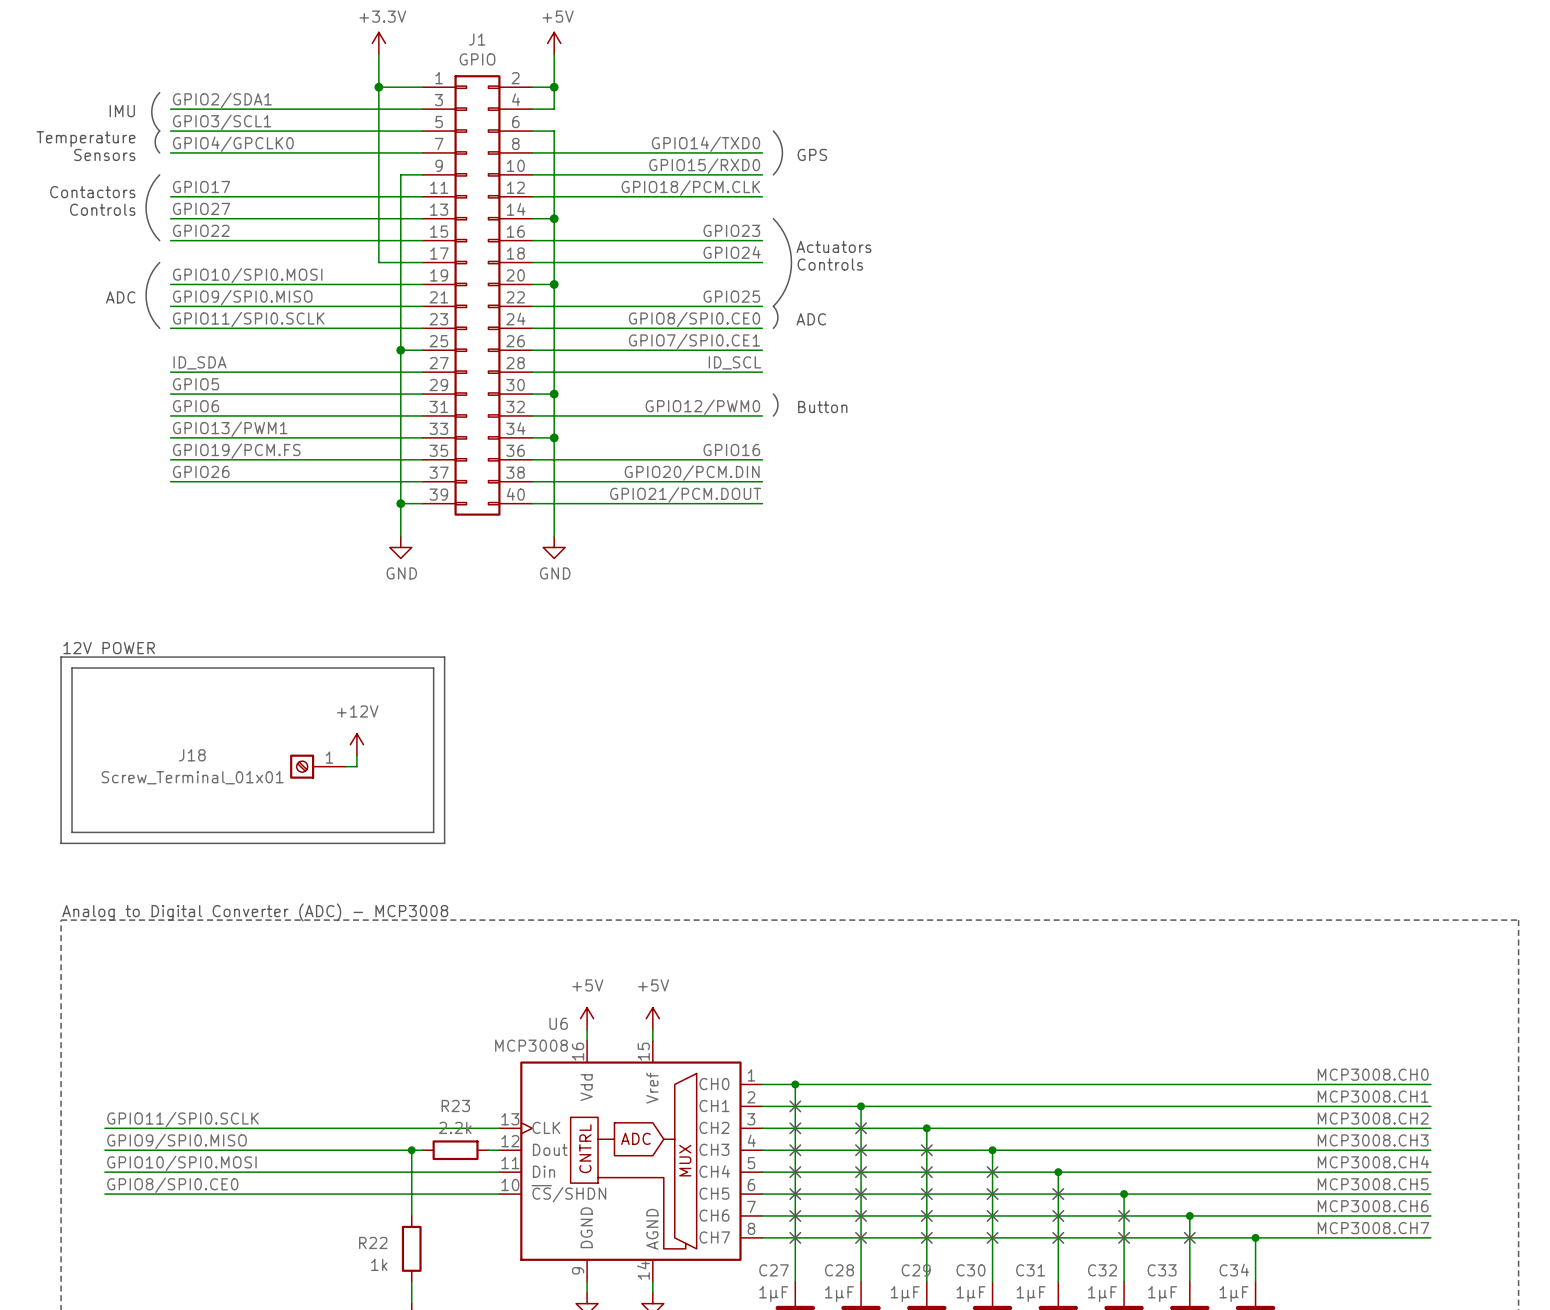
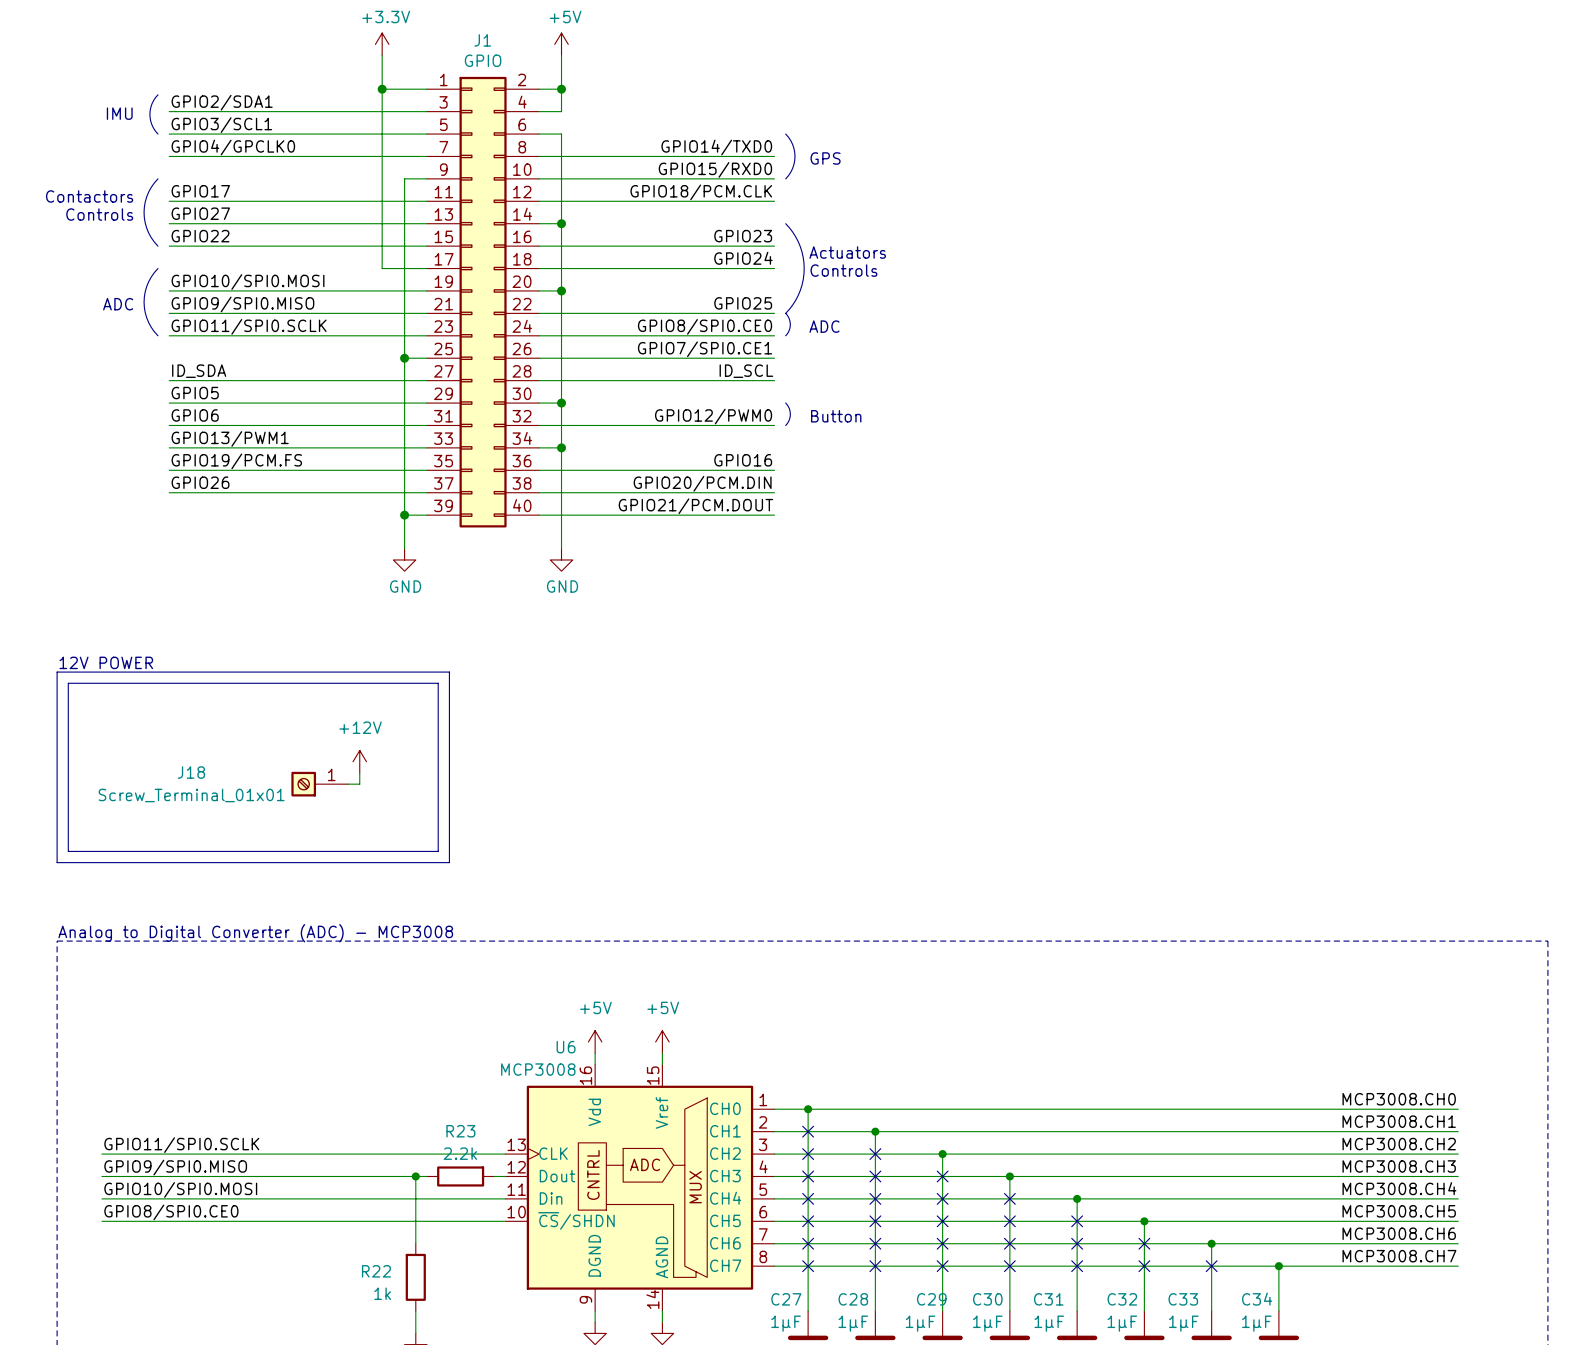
line: (159, 131) (155, 142) (159, 152) -> none
text: Temperature (86, 139) -> none
text: Sensors (104, 154) -> none

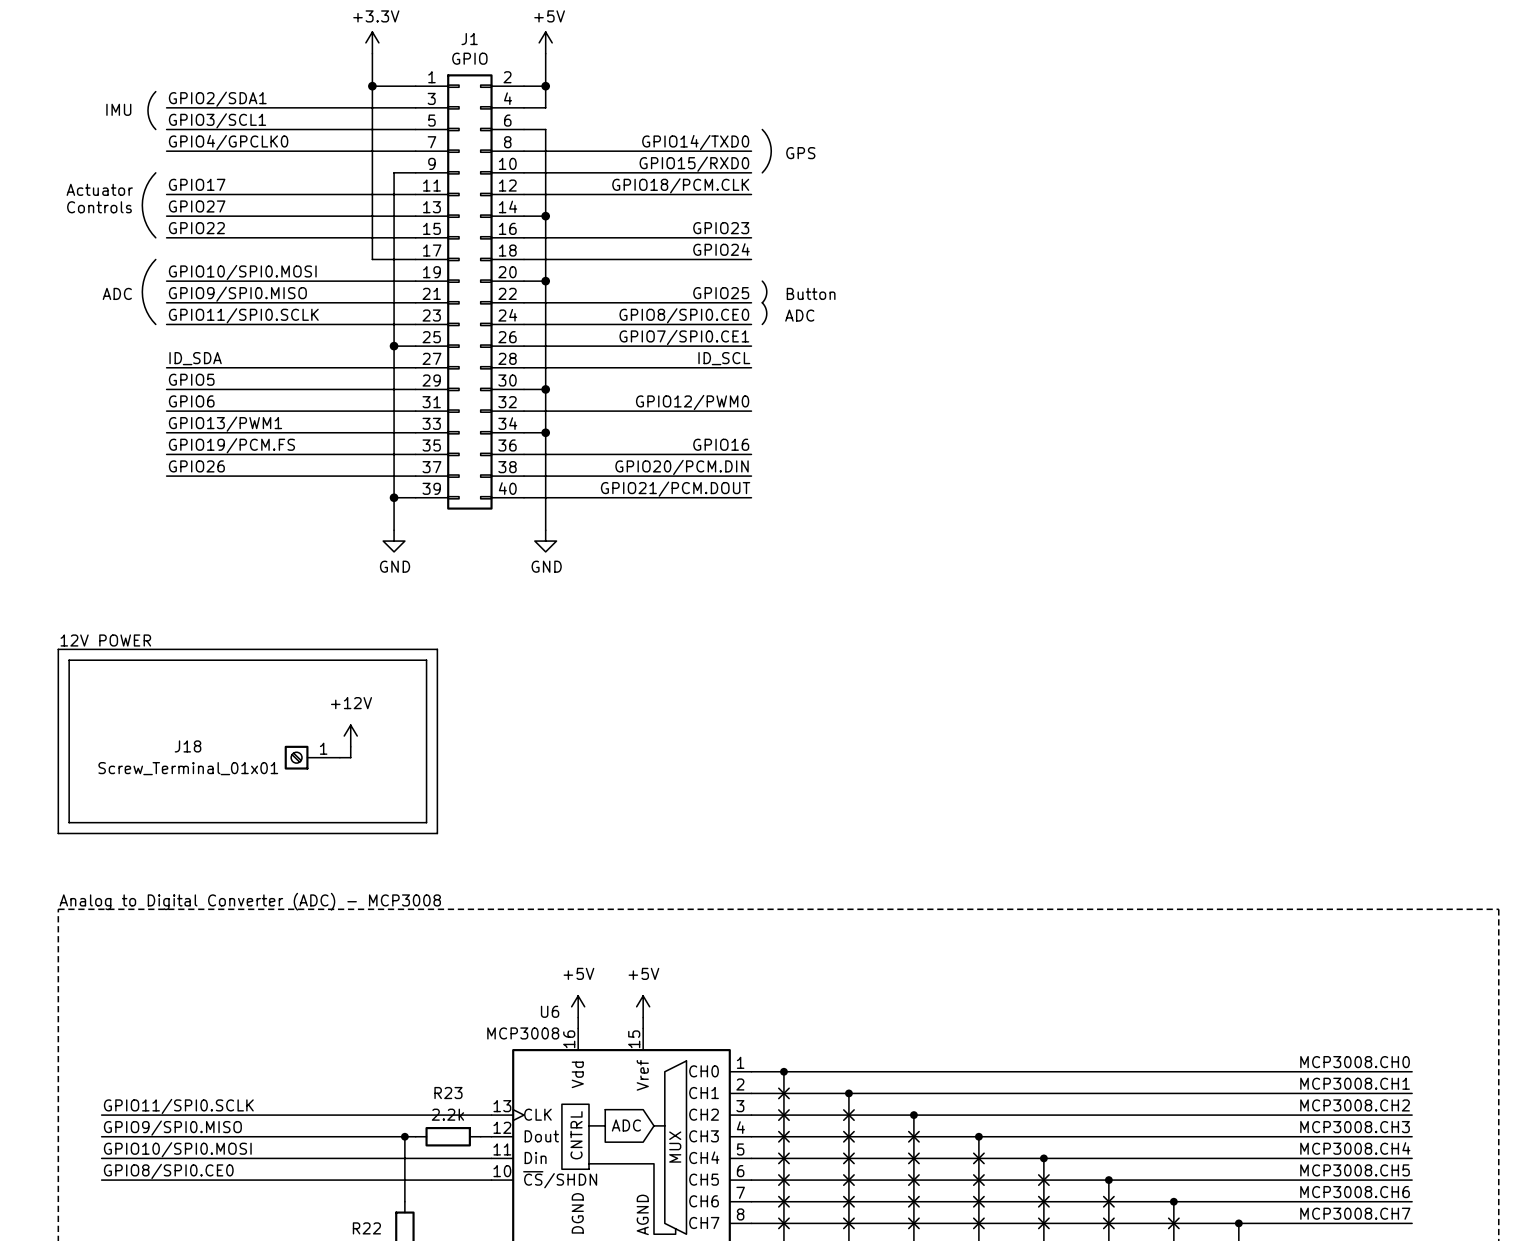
text: Contactors (89, 196) -> Actuator (99, 189)
line: (785, 223) (798, 241) (804, 268) (798, 295) (785, 313) -> (762, 281) (766, 291) (762, 302)
text: Actuators (847, 252) -> none
text: Controls (843, 270) -> none
line: (785, 403) (790, 414) (785, 425) -> none
text position: Button (836, 416) -> Button (811, 293)

